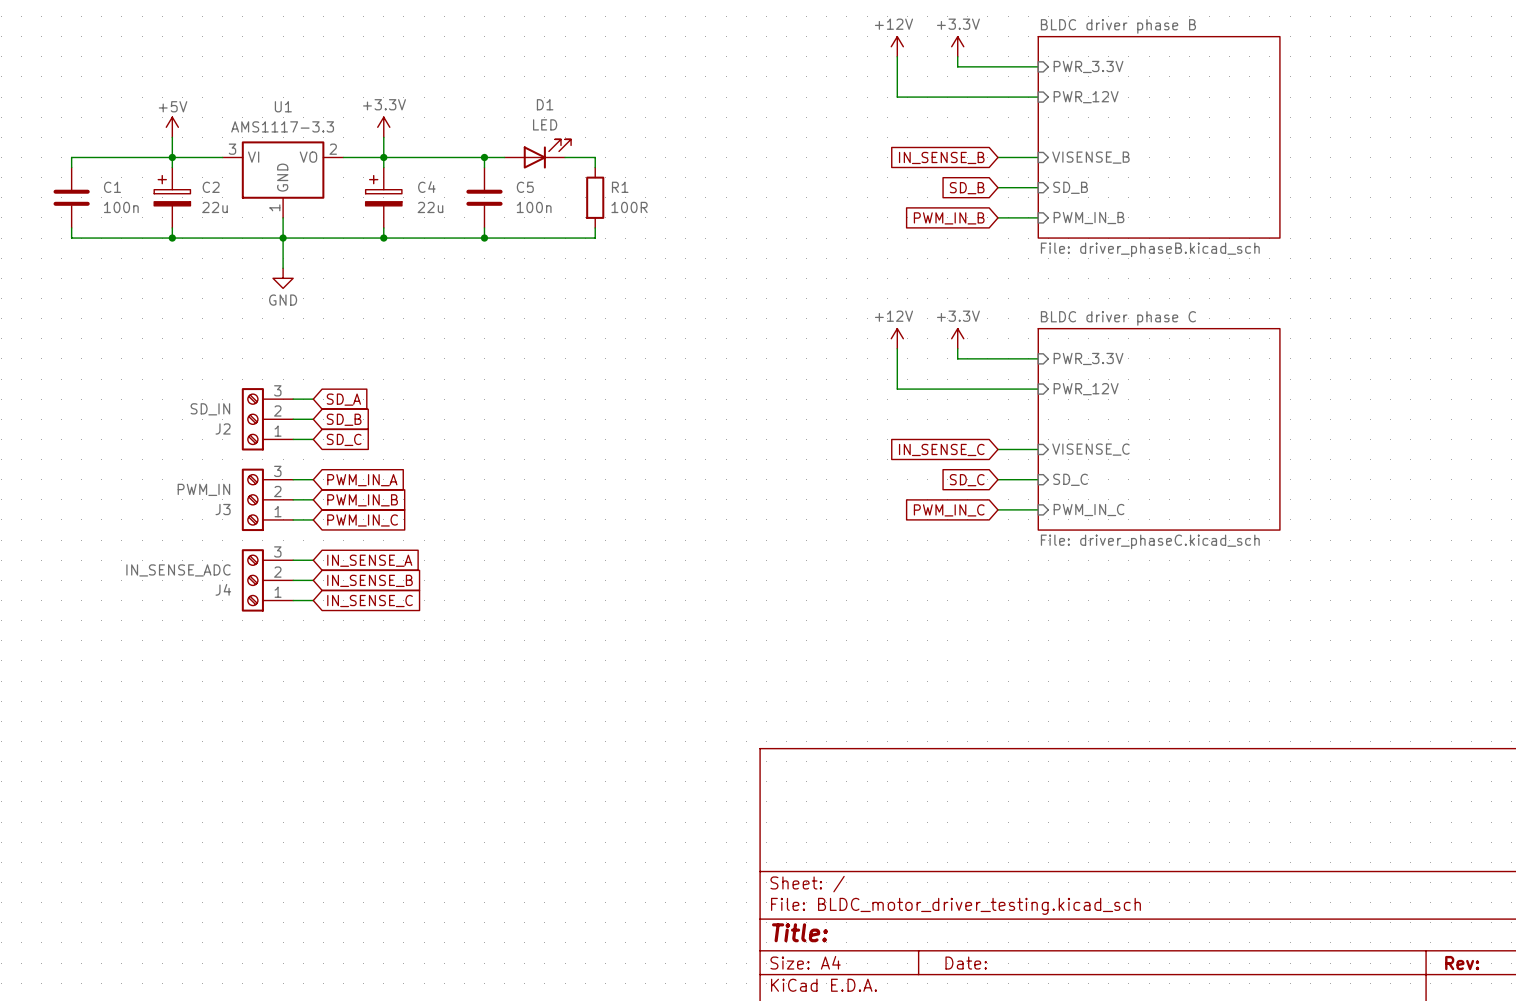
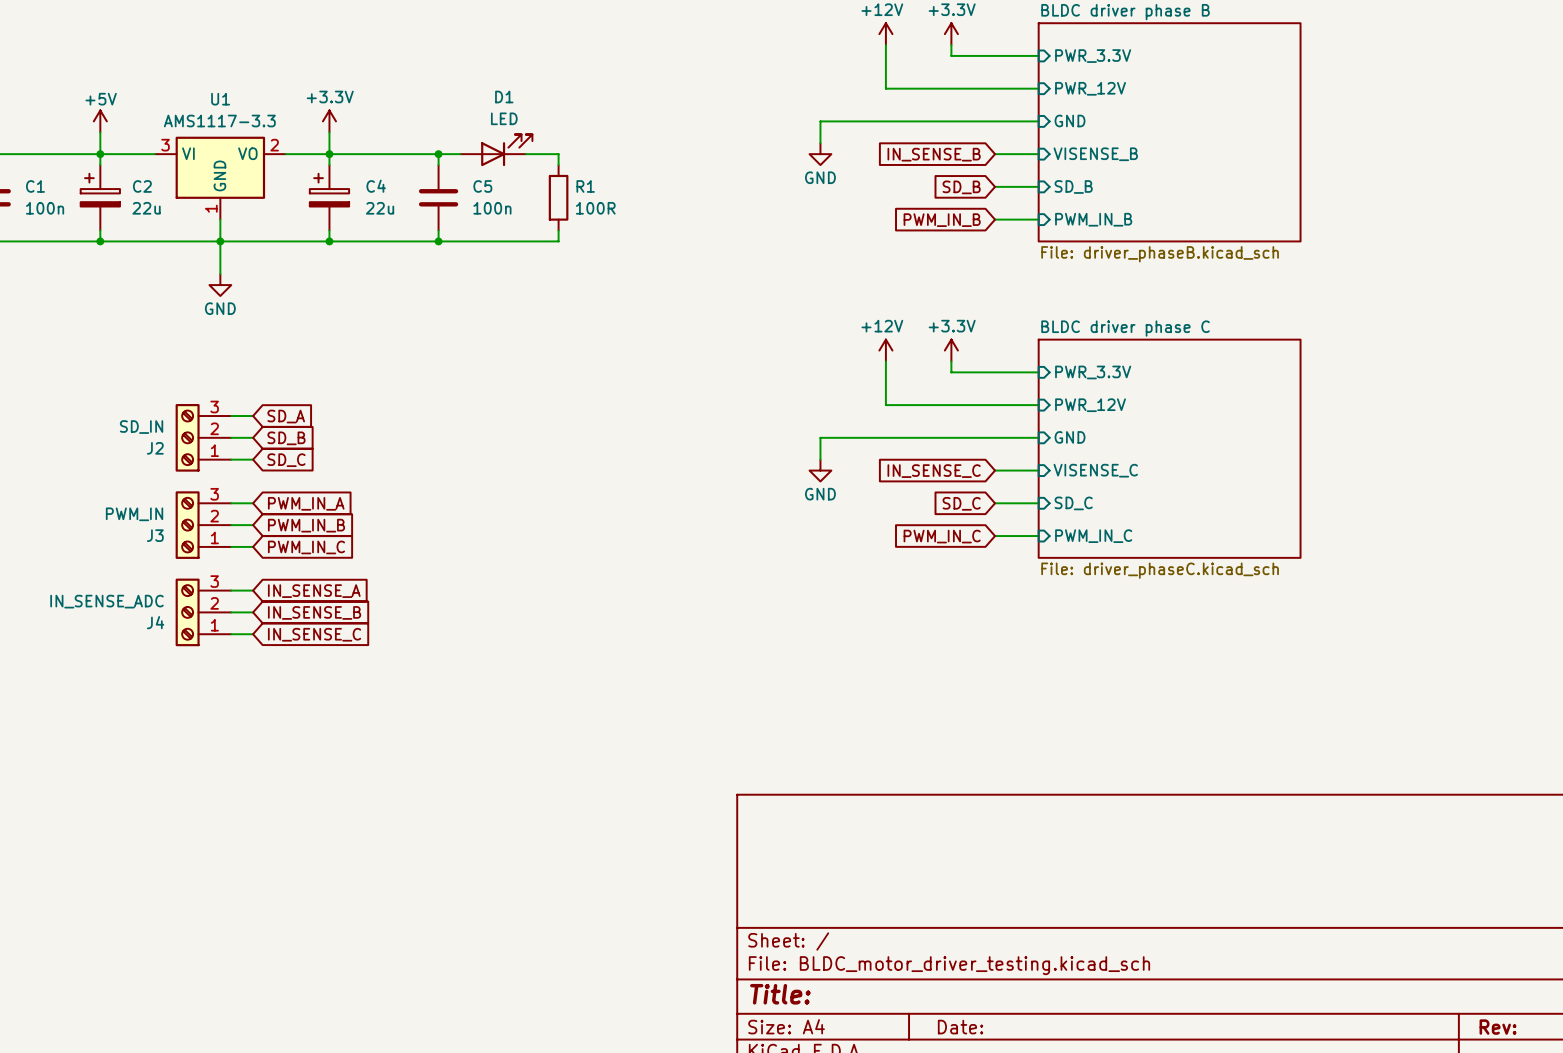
sheet pin: none -> GND (1070, 121)
wire: none -> (1038, 121) (820, 121) (820, 143)
power symbol: none -> GND (820, 154)
sheet pin: none -> GND (1070, 437)
wire: none -> (1038, 437) (820, 437) (820, 459)
power symbol: none -> GND (820, 470)

